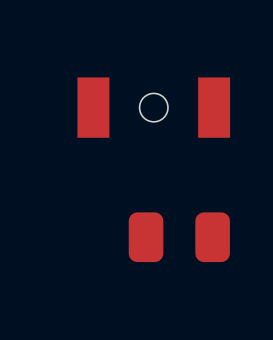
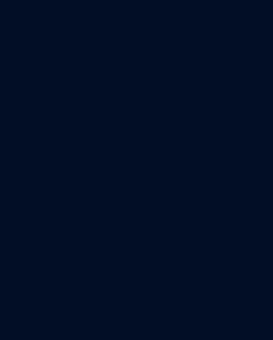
part: (153, 107) -> none
part: (179, 237) -> none

